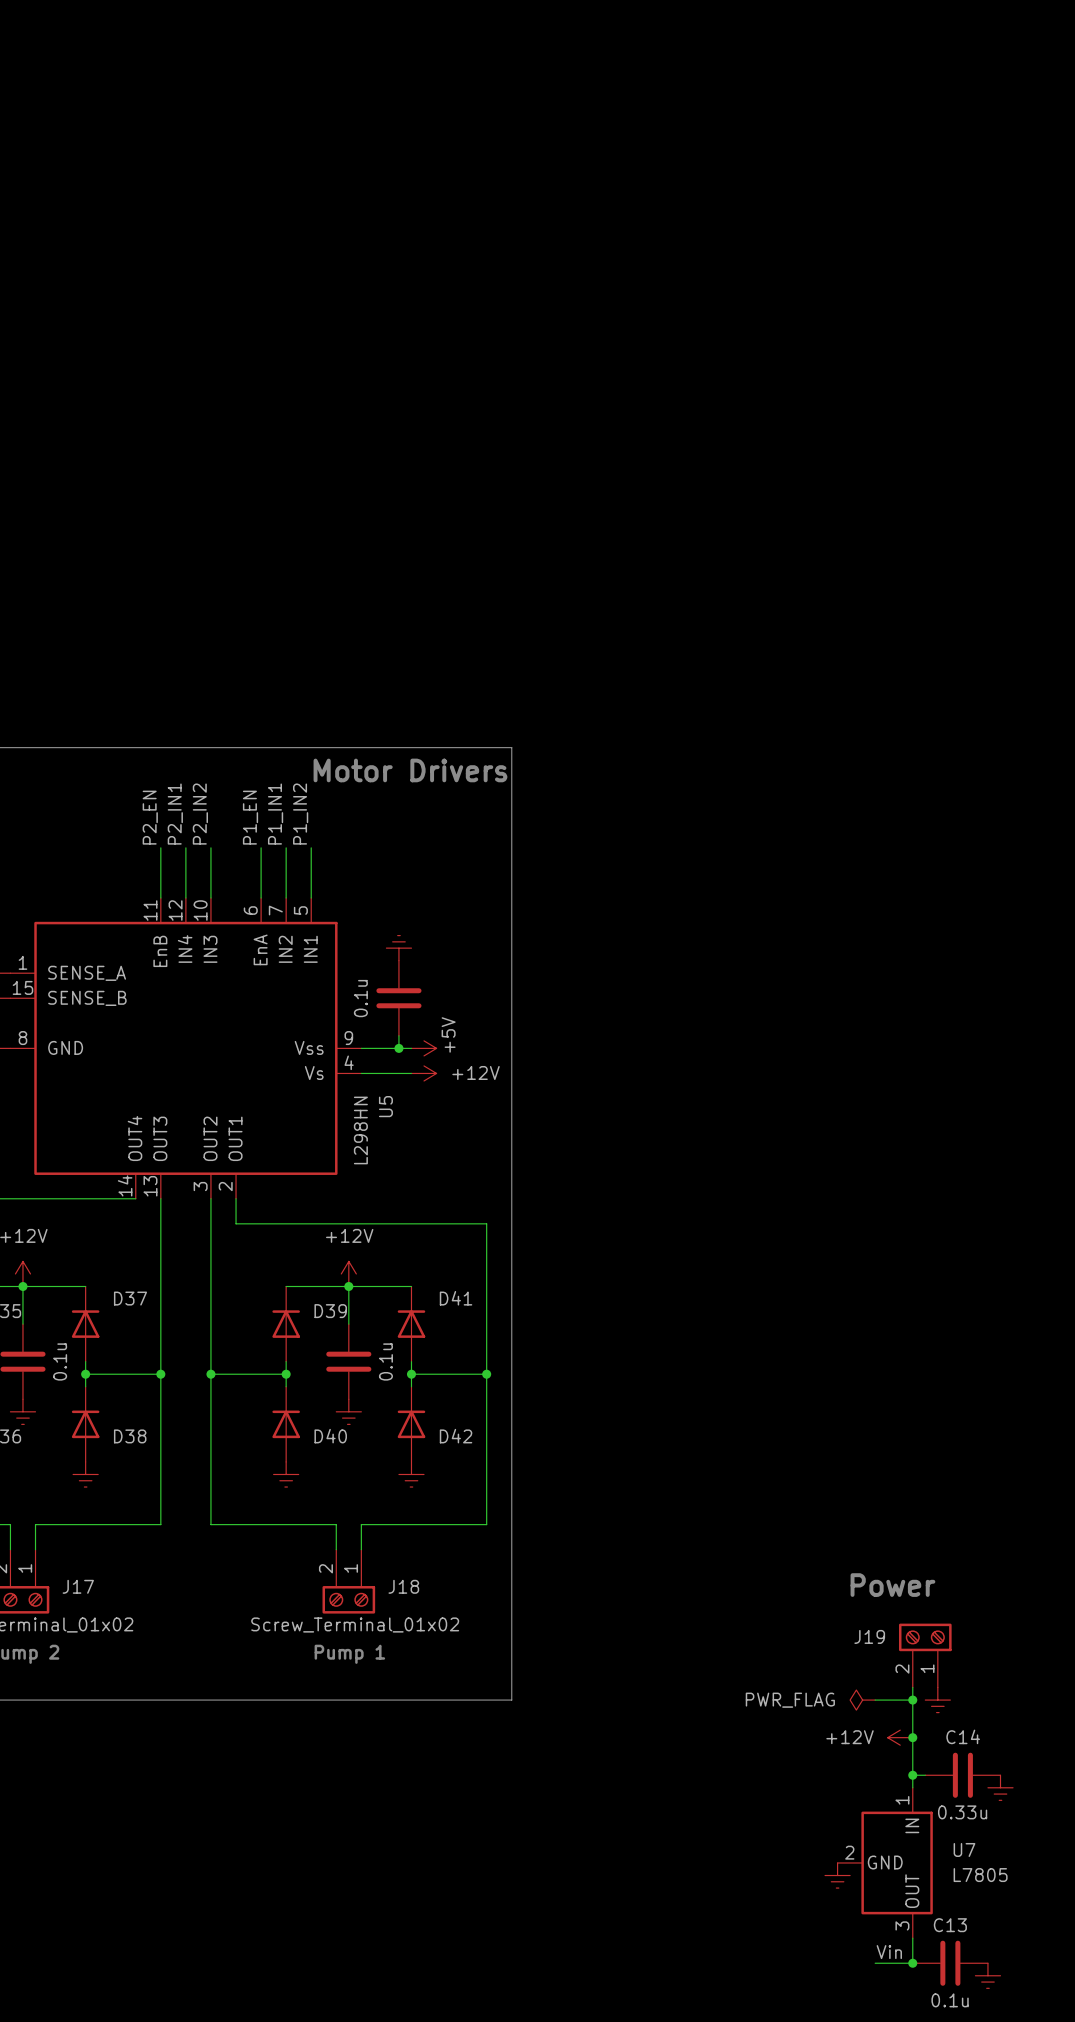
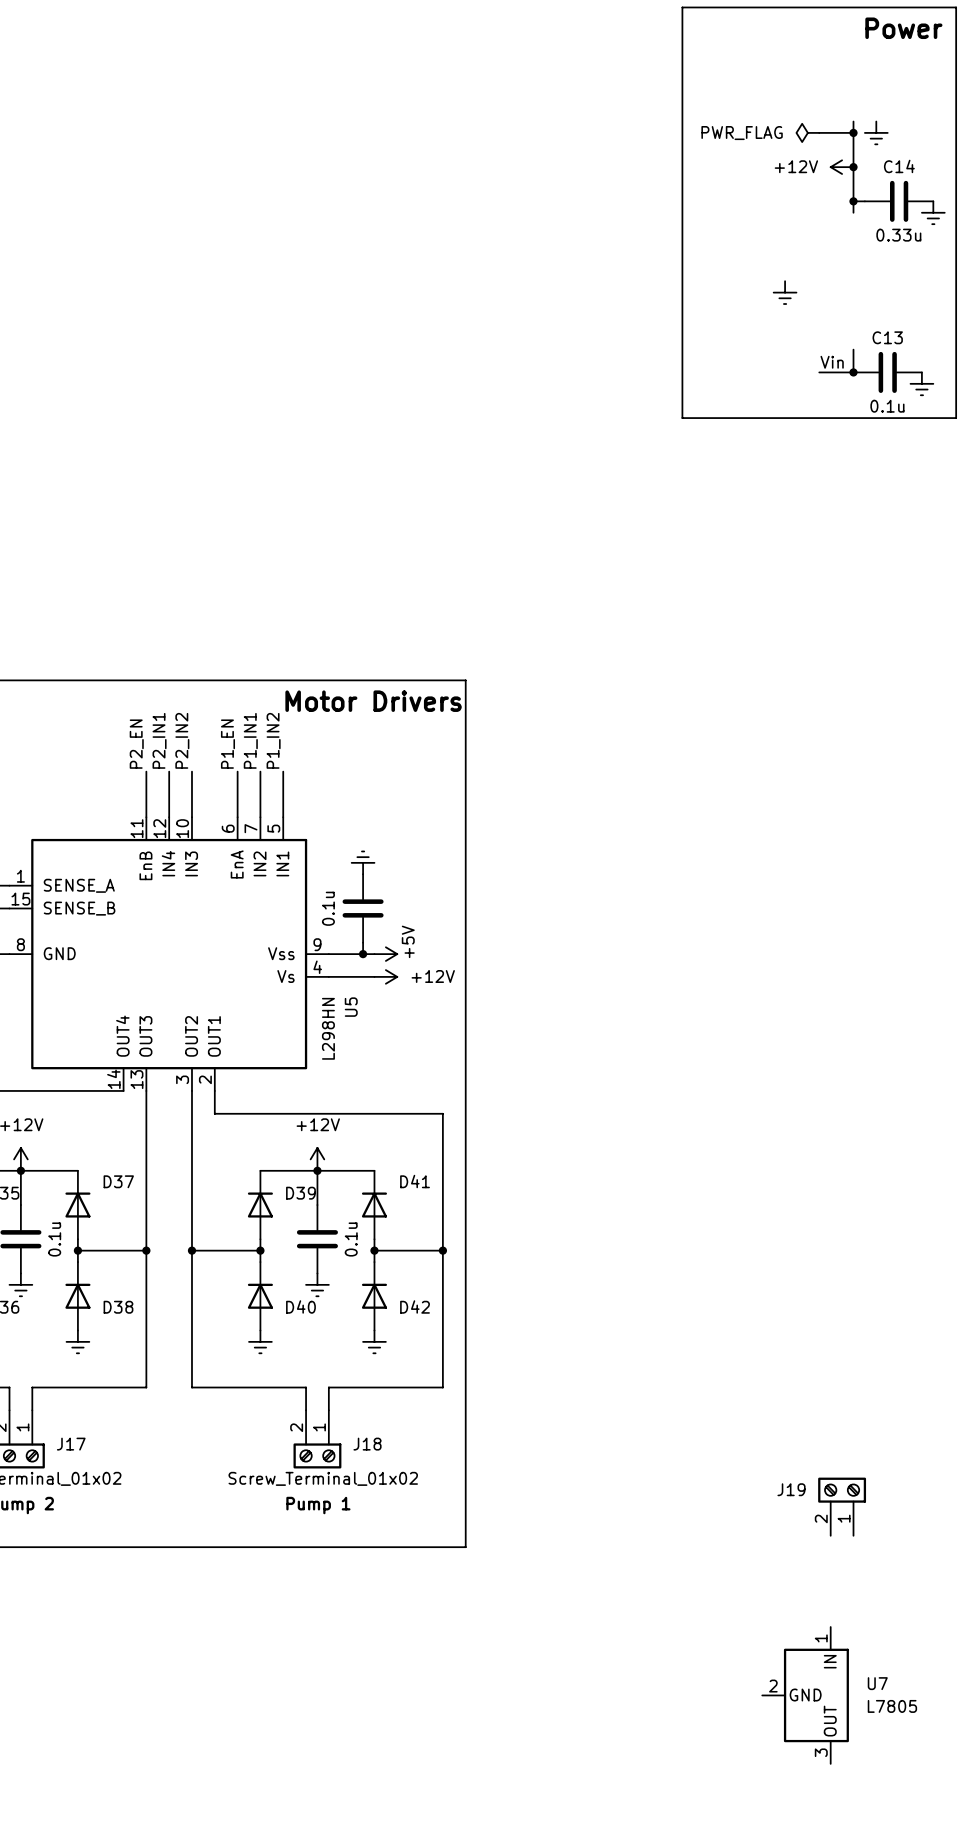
line: none -> (682, 7) (956, 7) (956, 418) (682, 418) (682, 7)
text: none -> Power (903, 28)
wire: none -> (853, 121) (853, 212)
power symbol: none -> PWR_FLAG (807, 132)
wire: none -> (819, 132) (853, 132)
junction: none -> (853, 132)
power symbol: none -> (876, 132)
power symbol: none -> +12V (842, 167)
junction: none -> (853, 167)
wire: none -> (853, 201) (864, 201)
junction: none -> (853, 201)
power symbol: none -> (933, 212)
power symbol: none -> (785, 292)
wire: none -> (853, 349) (853, 372) (819, 372)
label: none -> Vin (832, 362)
junction: none -> (853, 372)
power symbol: none -> (921, 383)
text: Power (892, 1585) -> none
wire: (912, 1687) (912, 1787) -> none
power symbol: PWR_FLAG (862, 1700) -> none
wire: (875, 1700) (912, 1700) -> none
junction: (912, 1700) -> none
power symbol: (937, 1700) -> none
power symbol: +12V (900, 1737) -> none
junction: (912, 1737) -> none
wire: (912, 1775) (925, 1775) -> none
junction: (912, 1775) -> none
C14 position: (962, 1775) -> (899, 201)
power symbol: (1000, 1787) -> none
power symbol: (837, 1875) -> none
wire: (912, 1938) (912, 1963) (875, 1963) -> none
label: Vin (889, 1952) -> none
junction: (912, 1963) -> none
C13 position: (950, 1963) -> (887, 372)
power symbol: (987, 1975) -> none

